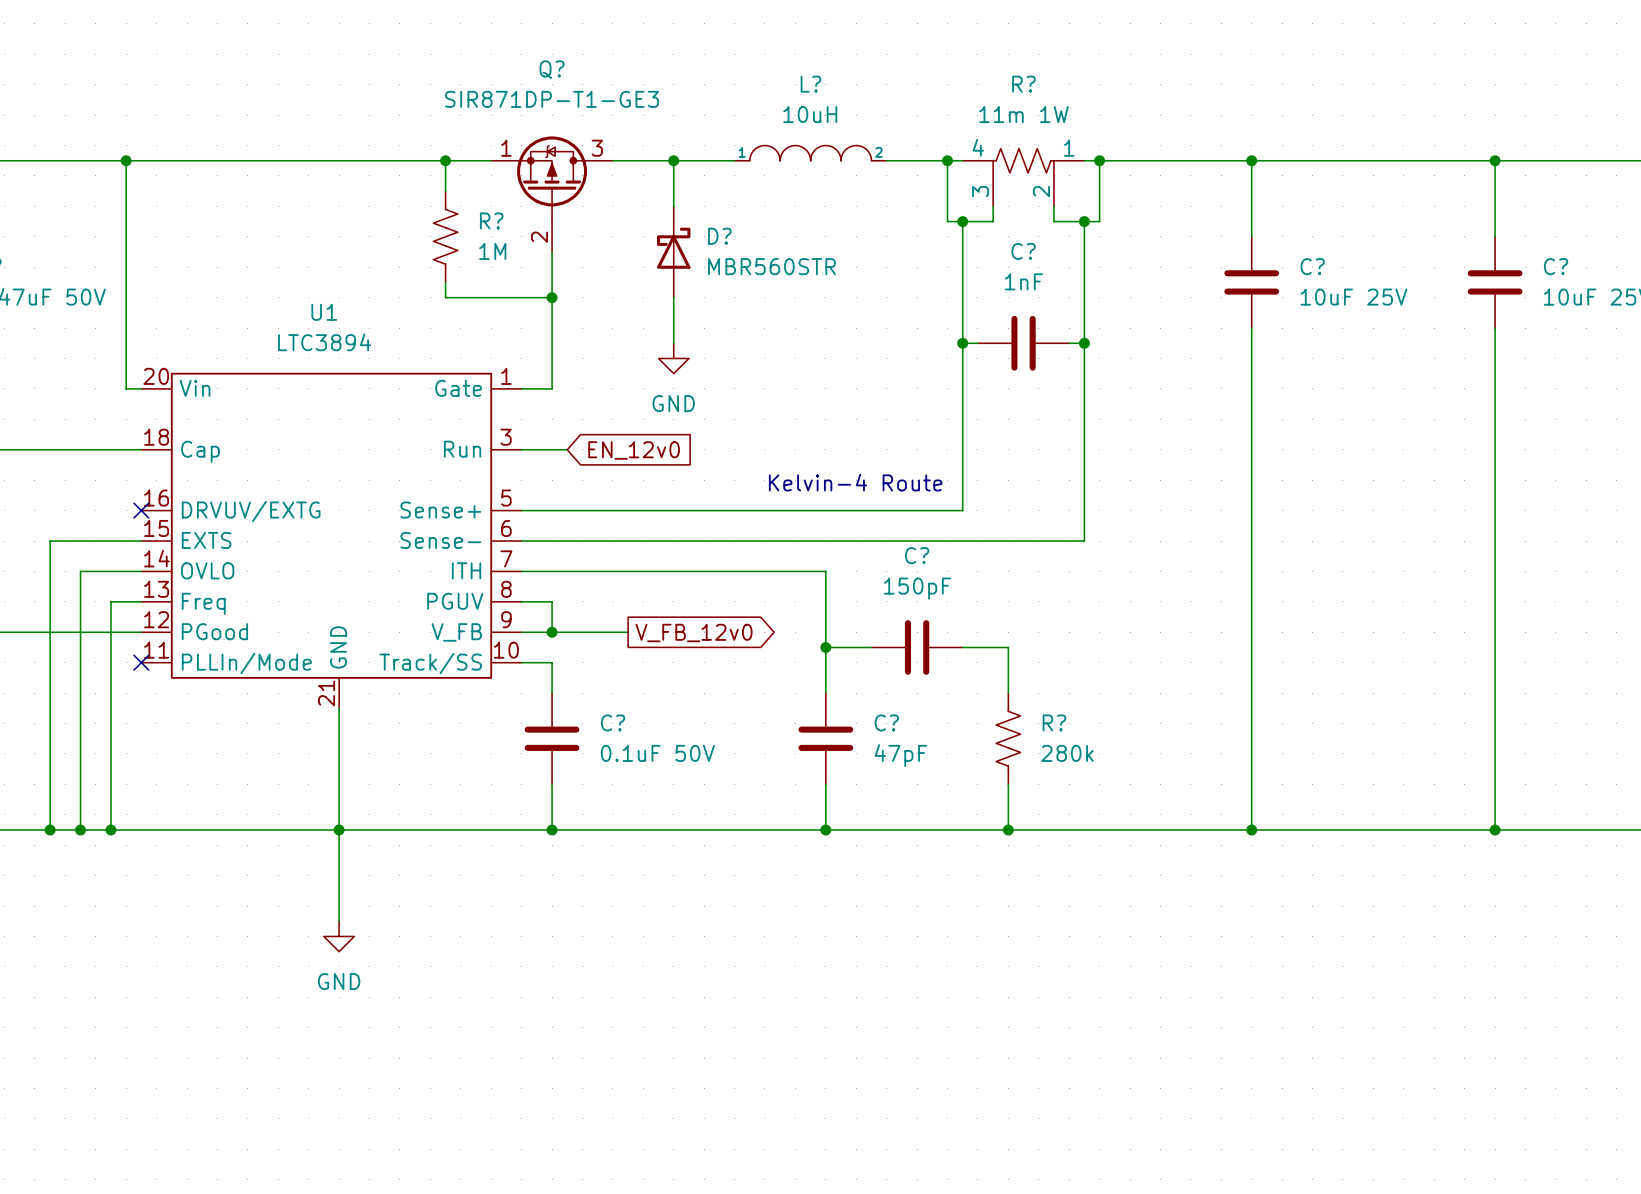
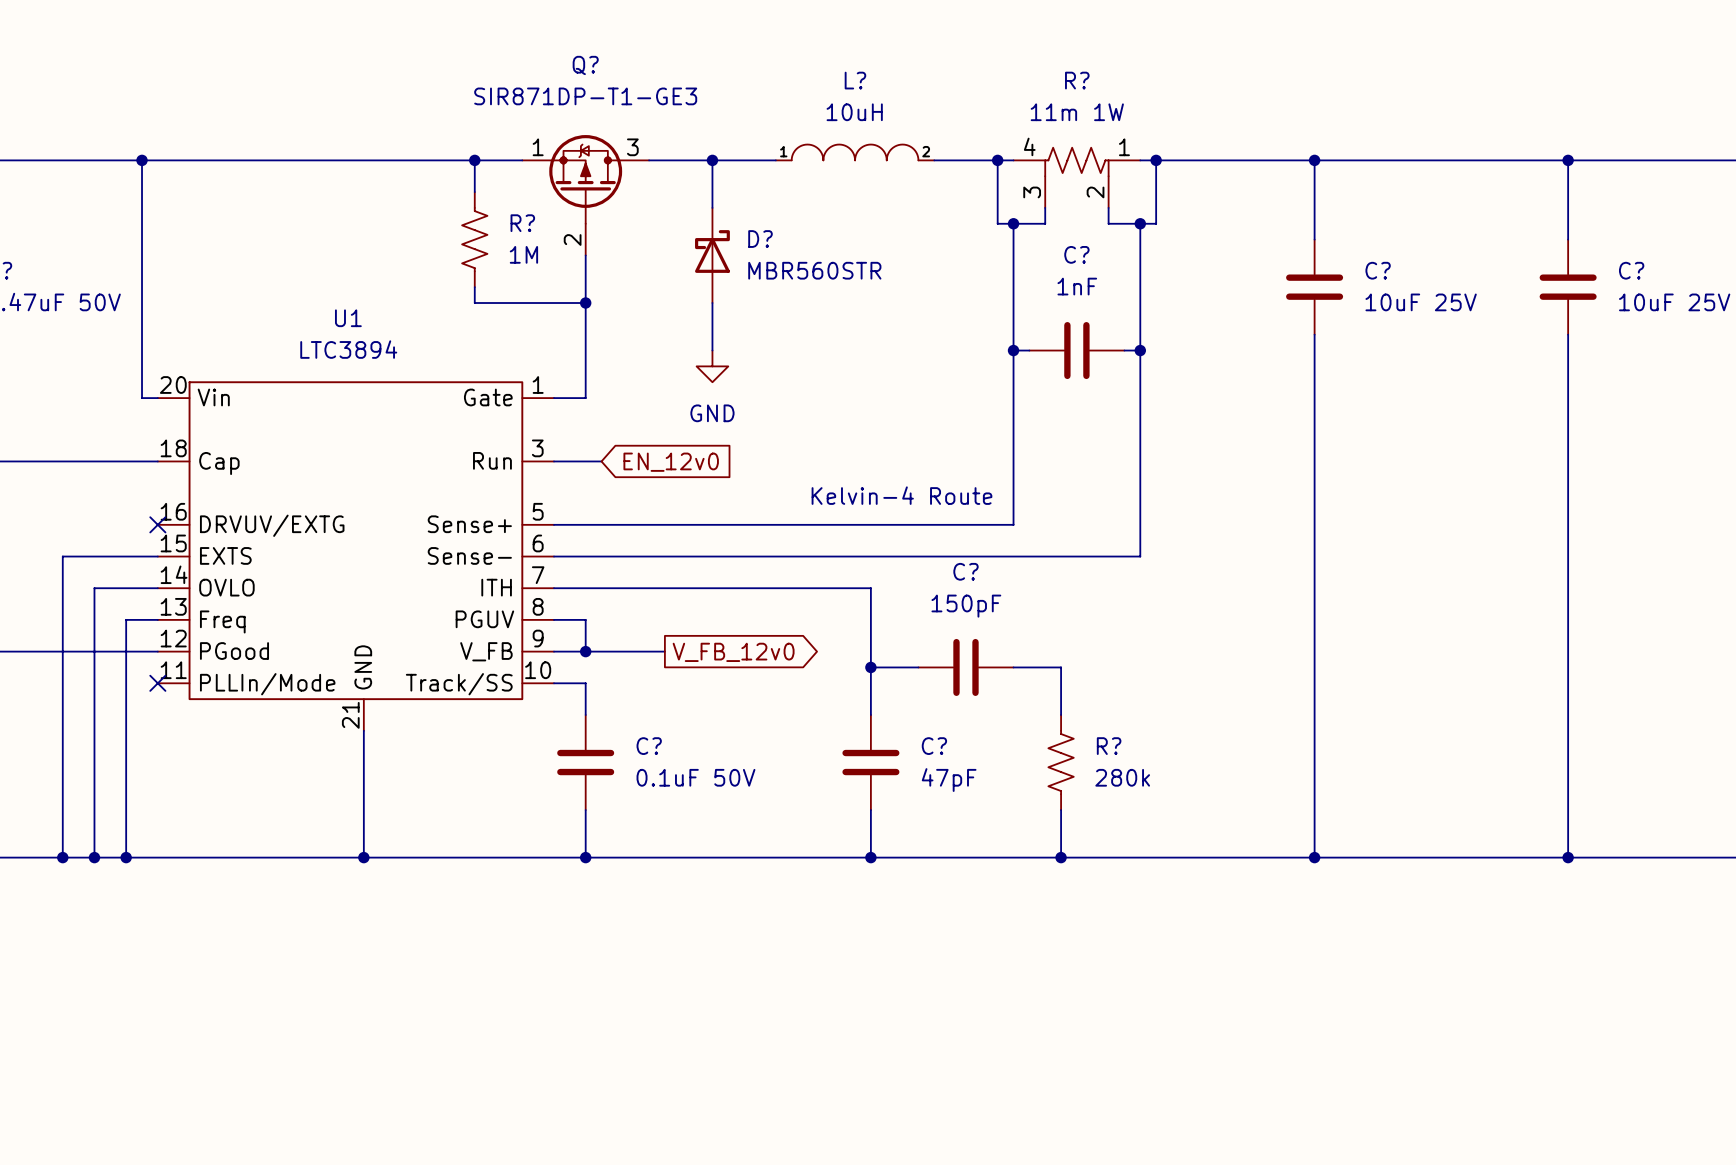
wire: (339, 830) (339, 921) -> none
power symbol: GND (339, 936) -> none

